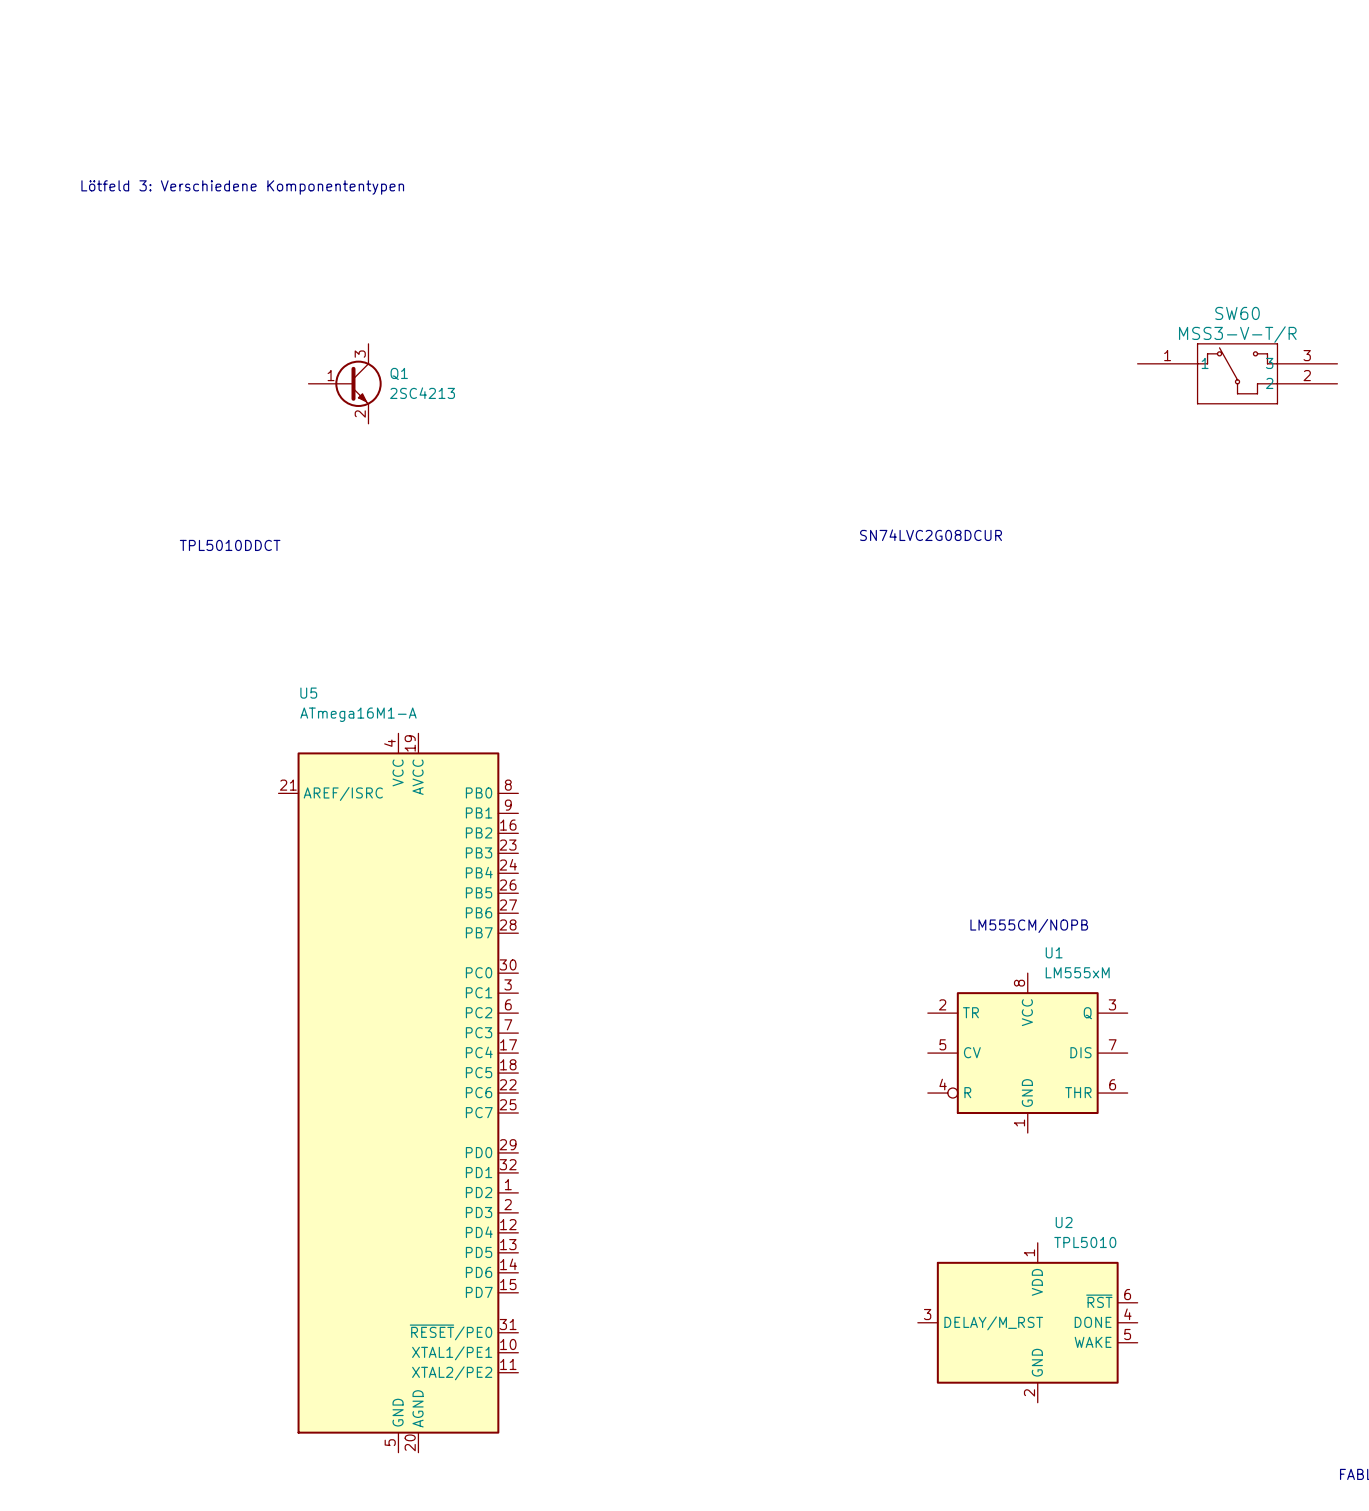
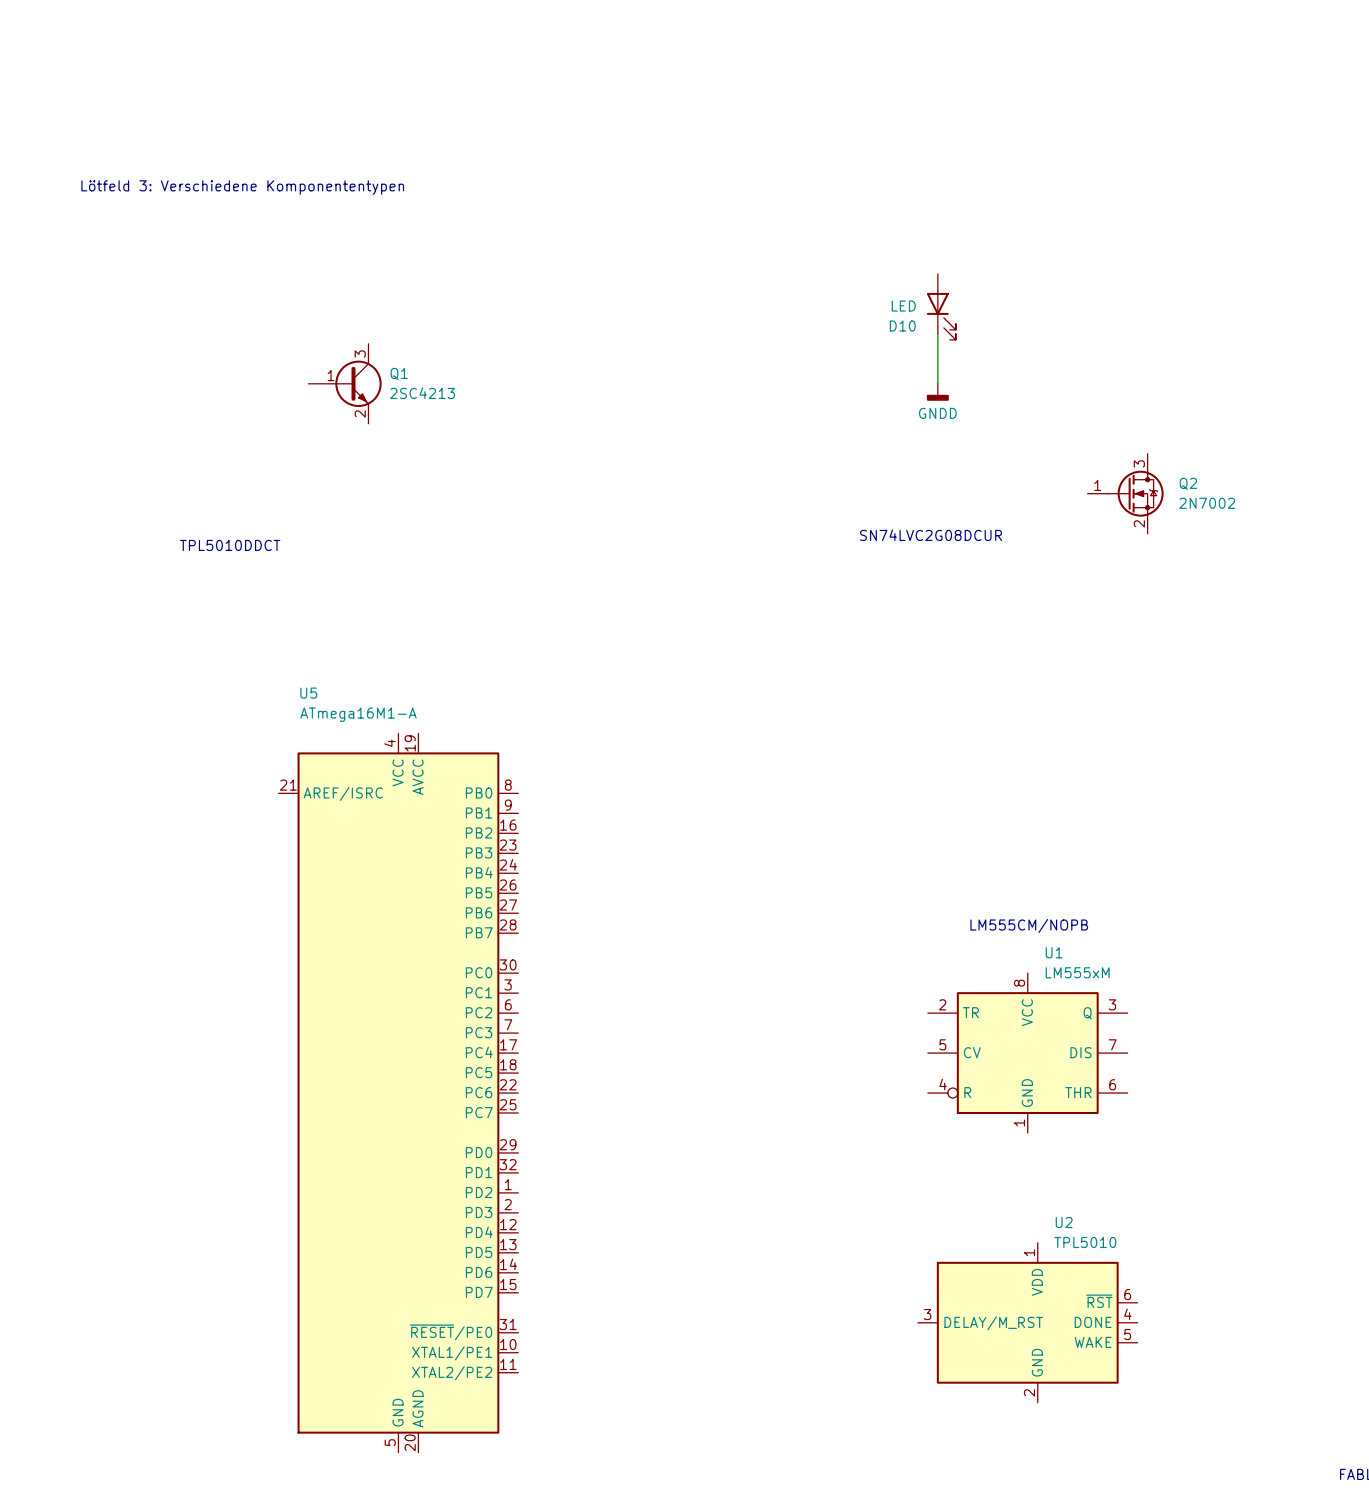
D10: none -> LED (941, 306)
wire: none -> (937, 333) (937, 383)
SW60: MSS3-V-T/R (1237, 373) -> none
power symbol: none -> GNDD (937, 392)
Q2: none -> 2N7002 (1125, 493)

